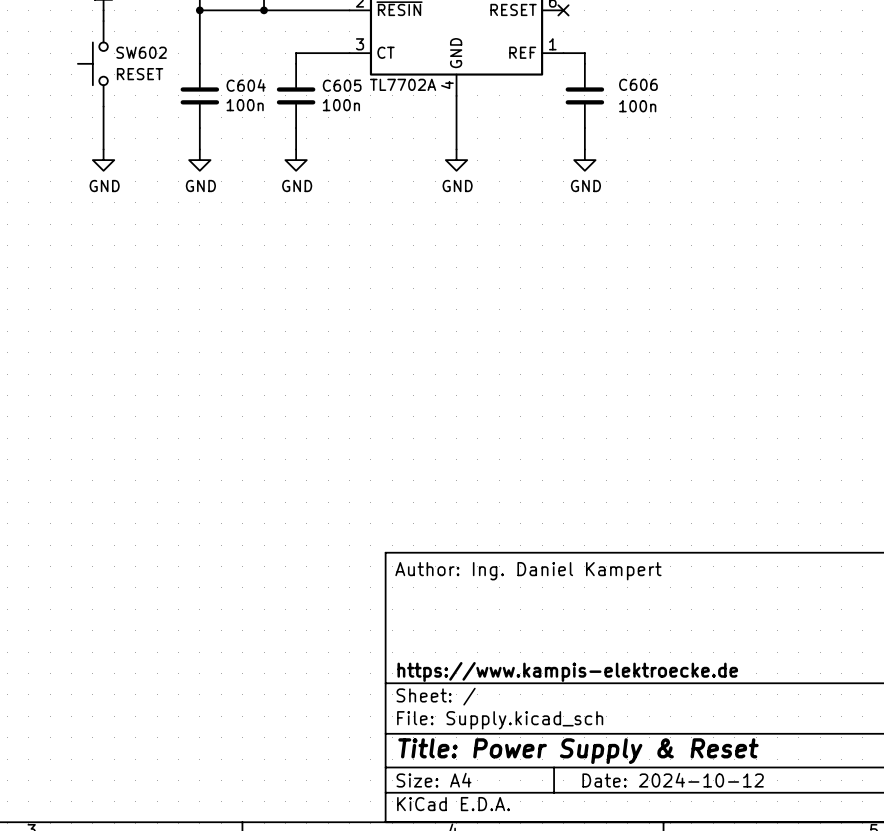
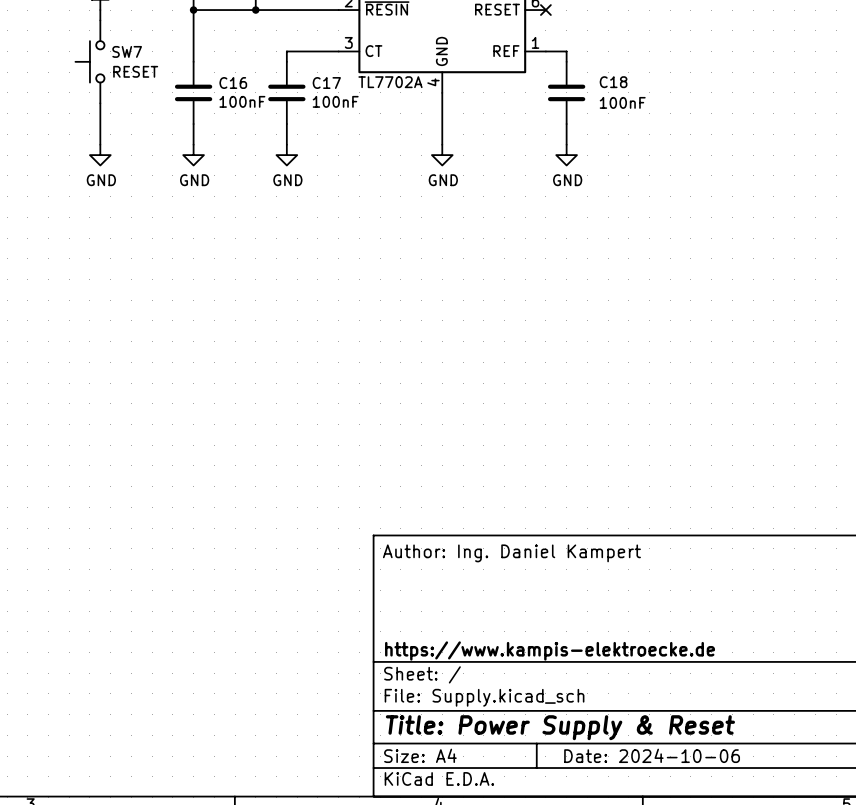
SW602 name: SW602 (141, 52) -> SW7 (127, 51)
C606 name: C606 (638, 84) -> C18 (613, 82)
C604 name: C604 (246, 85) -> C16 (233, 83)
C605 name: C605 (342, 85) -> C17 (326, 83)
C604 value: 100n (245, 105) -> 100nF (242, 101)
C605 value: 100n (341, 105) -> 100nF (335, 101)
C606 value: 100n (637, 106) -> 100nF (622, 102)
title block: Date: 2024-10-12 (673, 780) -> Date: 2024-10-06 (652, 755)

